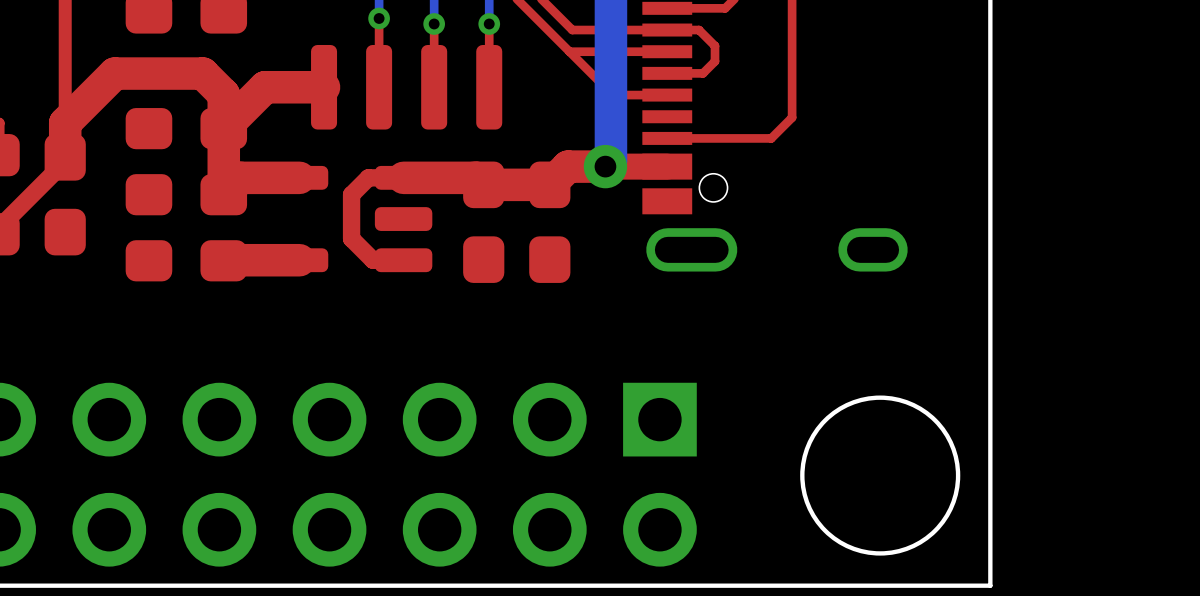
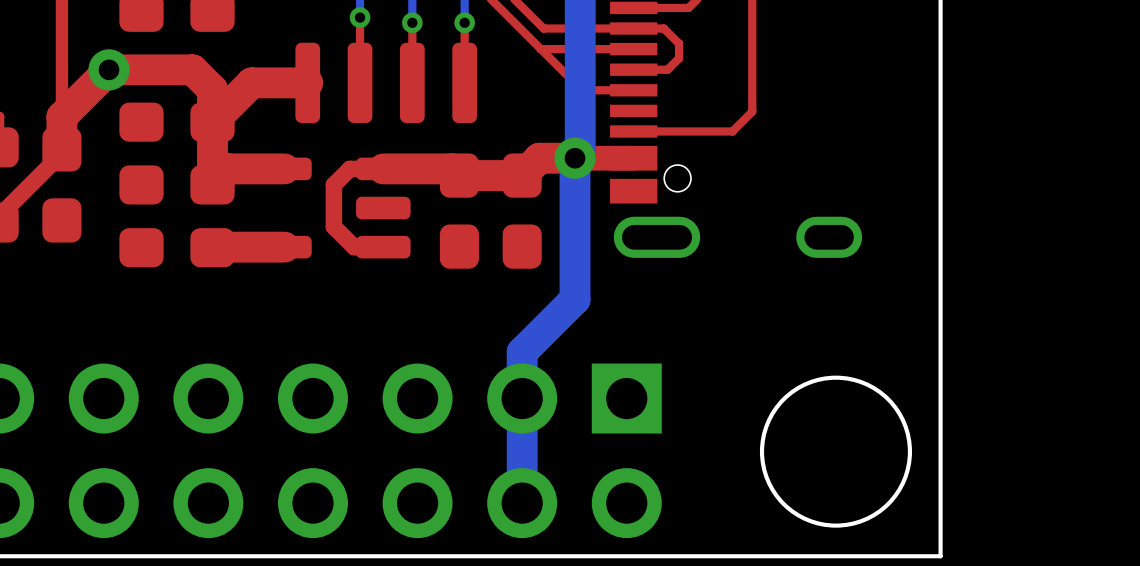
via: none -> (109, 69)
bottom track: none -> (575, 158) (575, 299) (522, 352) (522, 503)

